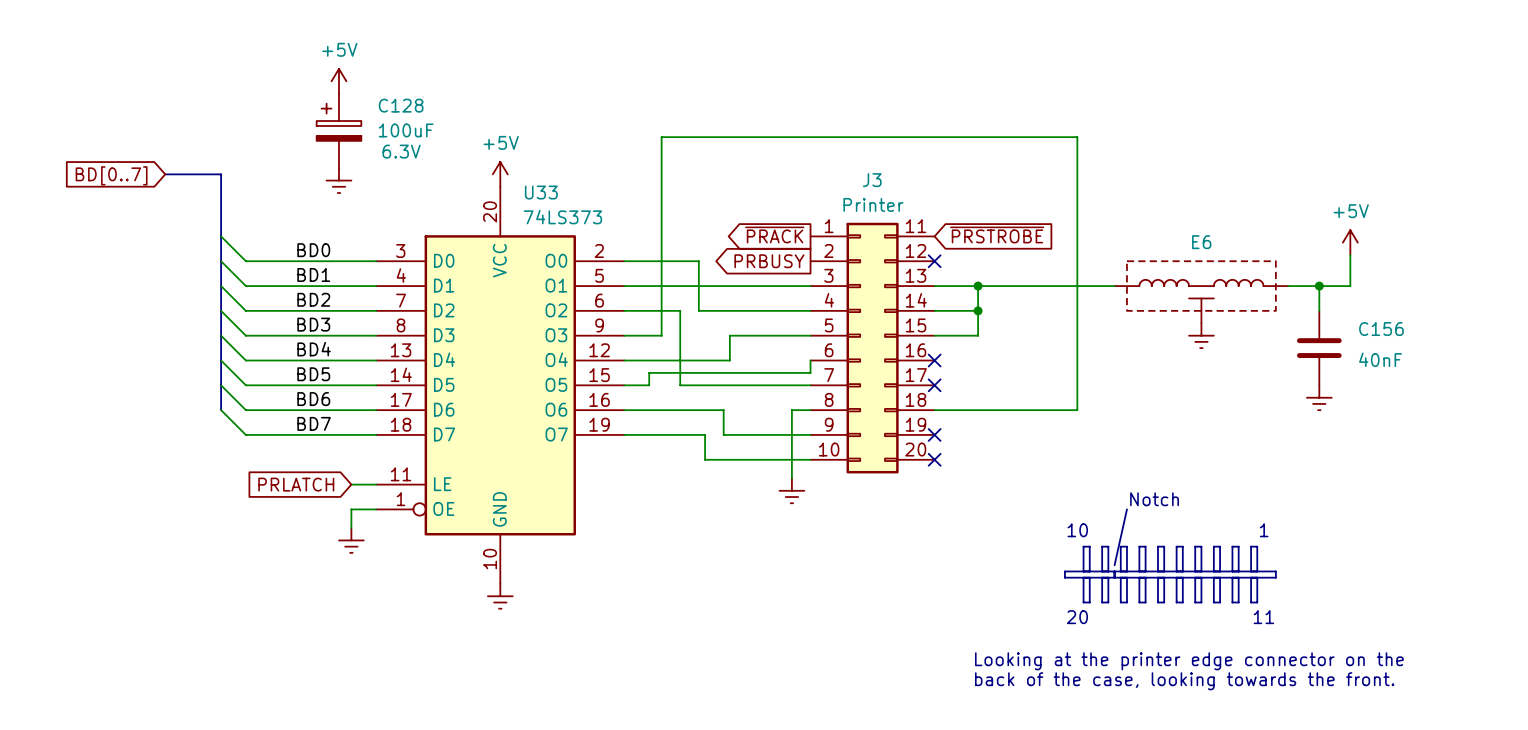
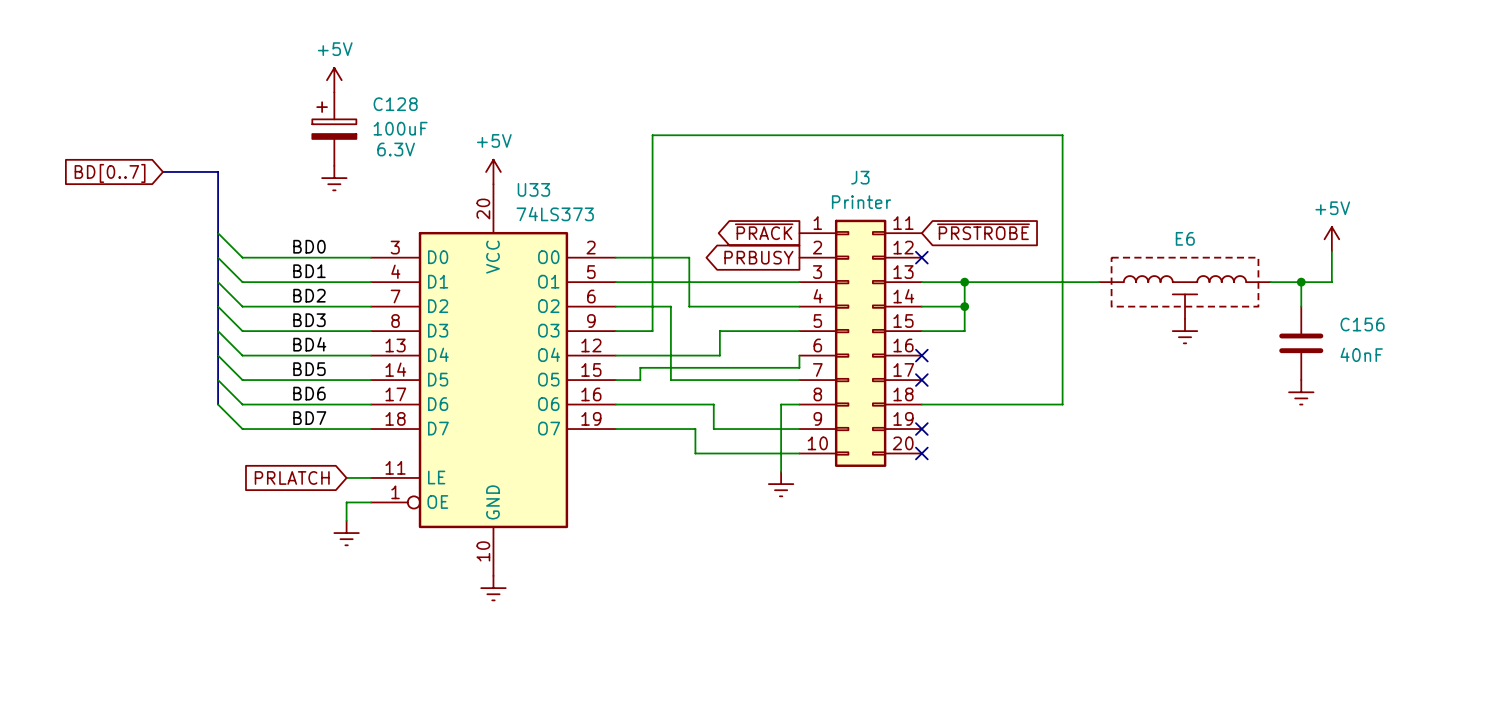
text: Notch (1154, 499) -> none
line: (1126, 509) (1114, 565) -> none
text: 10 (1077, 530) -> none
text: 1 (1264, 530) -> none
line: (1064, 571) (1275, 571) (1275, 577) (1064, 577) (1064, 571) -> none
line: (1083, 571) (1083, 546) (1089, 546) (1089, 571) -> none
line: (1102, 571) (1102, 546) (1108, 546) (1108, 571) -> none
line: (1120, 571) (1120, 546) (1126, 546) (1126, 571) -> none
line: (1139, 571) (1139, 546) (1145, 546) (1145, 571) -> none
line: (1158, 571) (1158, 546) (1164, 546) (1164, 571) -> none
line: (1176, 571) (1176, 546) (1182, 546) (1182, 571) -> none
line: (1195, 571) (1195, 546) (1201, 546) (1201, 571) -> none
line: (1213, 571) (1213, 546) (1220, 546) (1220, 571) -> none
line: (1232, 571) (1232, 546) (1238, 546) (1238, 571) -> none
line: (1251, 571) (1251, 546) (1257, 546) (1257, 571) -> none
line: (1083, 577) (1083, 602) (1089, 602) (1089, 577) -> none
line: (1102, 577) (1102, 602) (1108, 602) (1108, 577) -> none
line: (1120, 577) (1120, 602) (1126, 602) (1126, 577) -> none
line: (1139, 577) (1139, 602) (1145, 602) (1145, 577) -> none
line: (1158, 577) (1158, 602) (1164, 602) (1164, 577) -> none
line: (1176, 577) (1176, 602) (1182, 602) (1182, 577) -> none
line: (1195, 577) (1195, 602) (1201, 602) (1201, 577) -> none
line: (1213, 577) (1213, 602) (1220, 602) (1220, 577) -> none
line: (1232, 577) (1232, 602) (1238, 602) (1238, 577) -> none
line: (1251, 577) (1251, 602) (1257, 602) (1257, 577) -> none
text: 20 (1077, 617) -> none
text: 11 (1263, 617) -> none
text: Looking at the printer edge connector on the (1189, 661) -> none
text: back of the case, looking towards the front. (1184, 681) -> none

